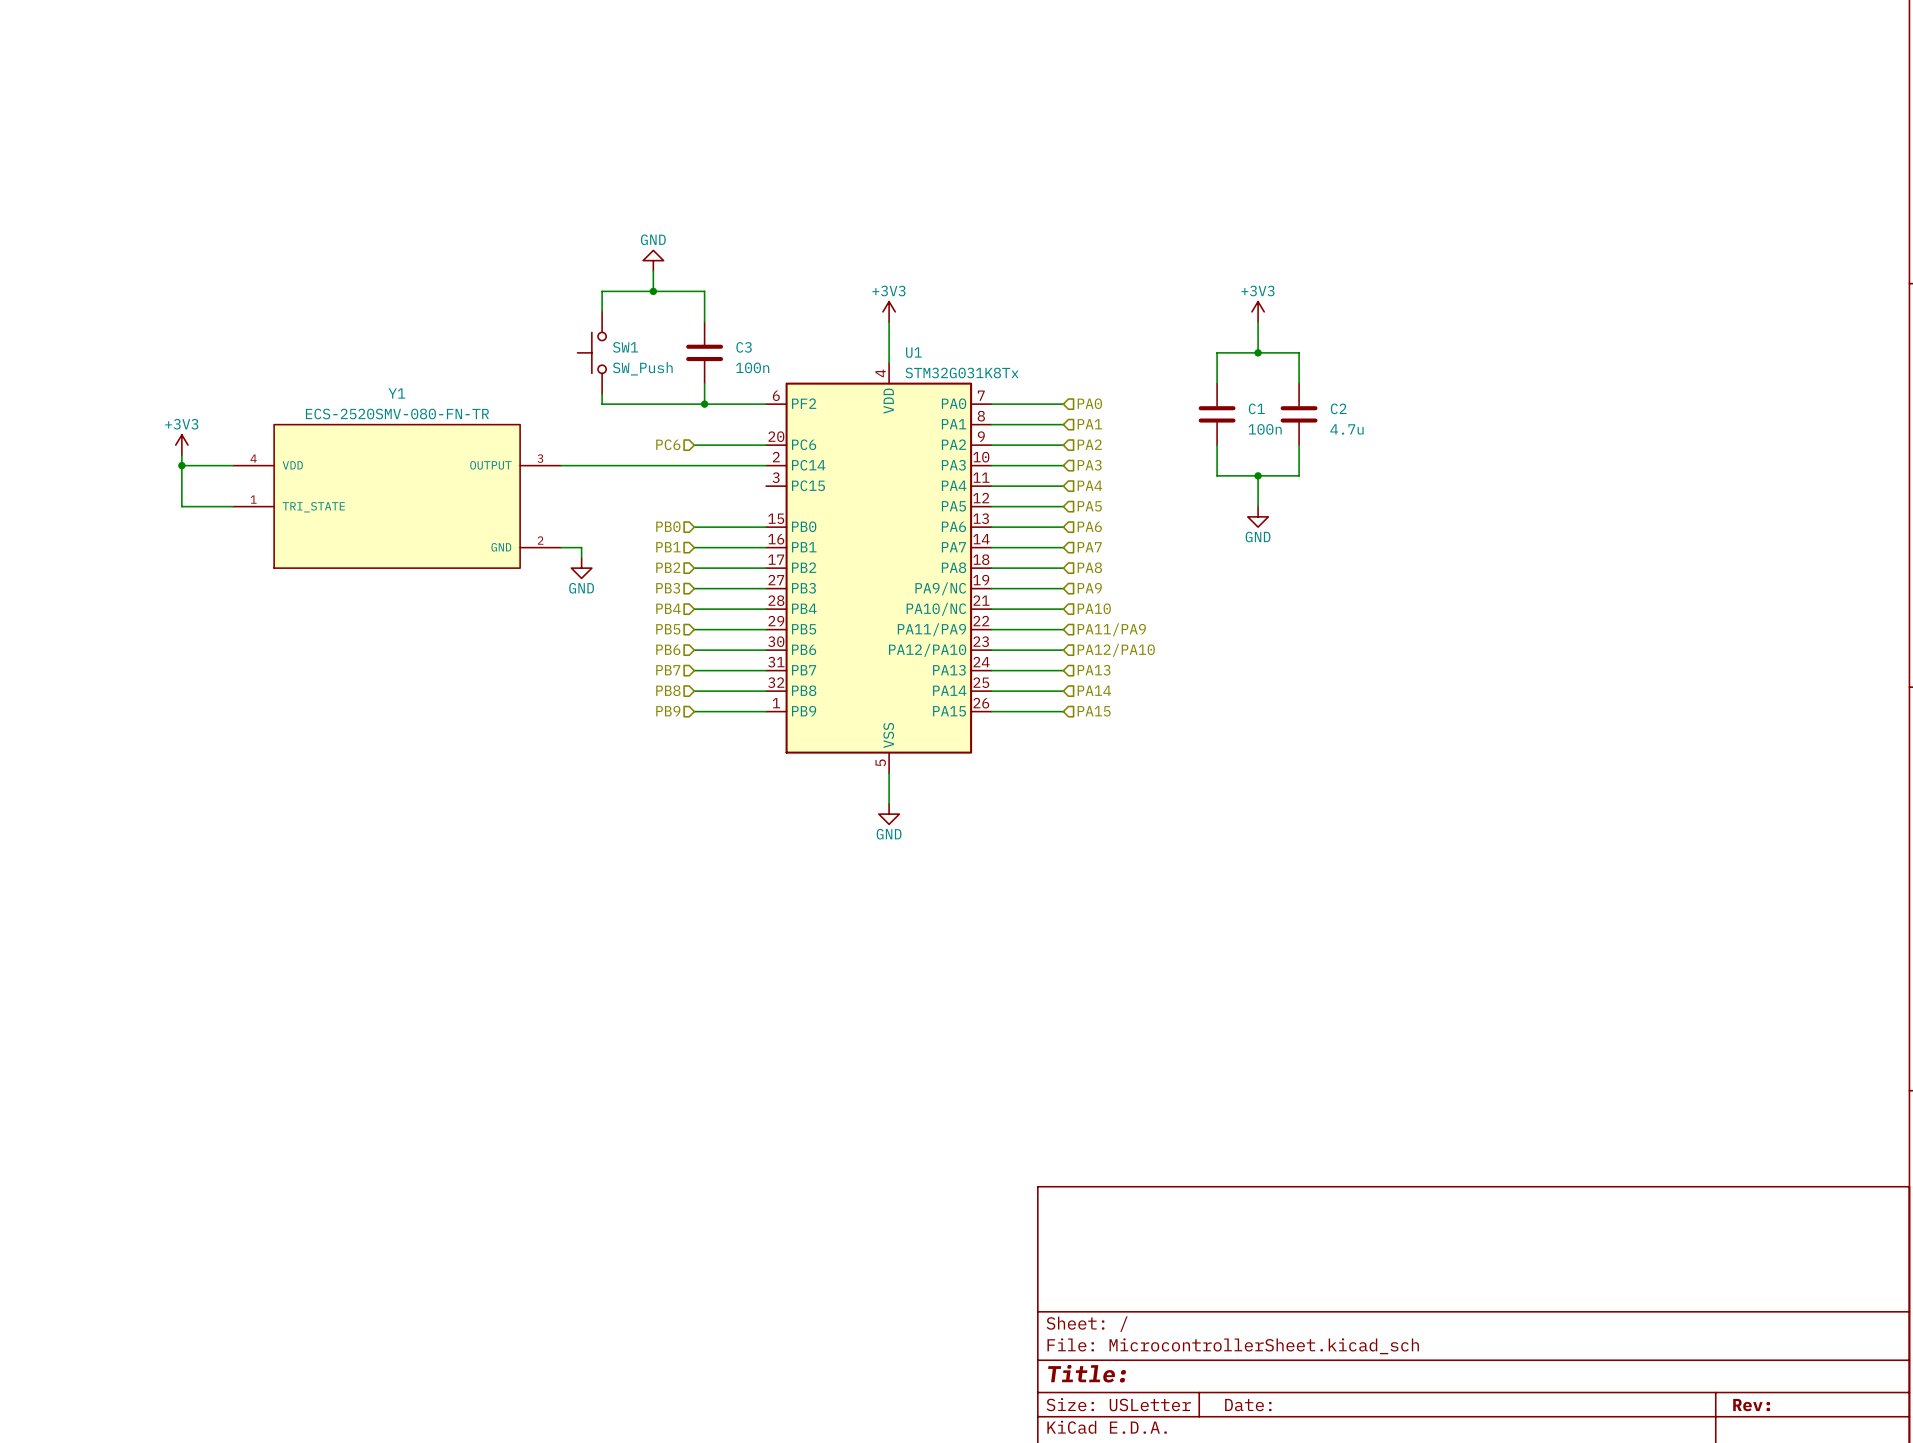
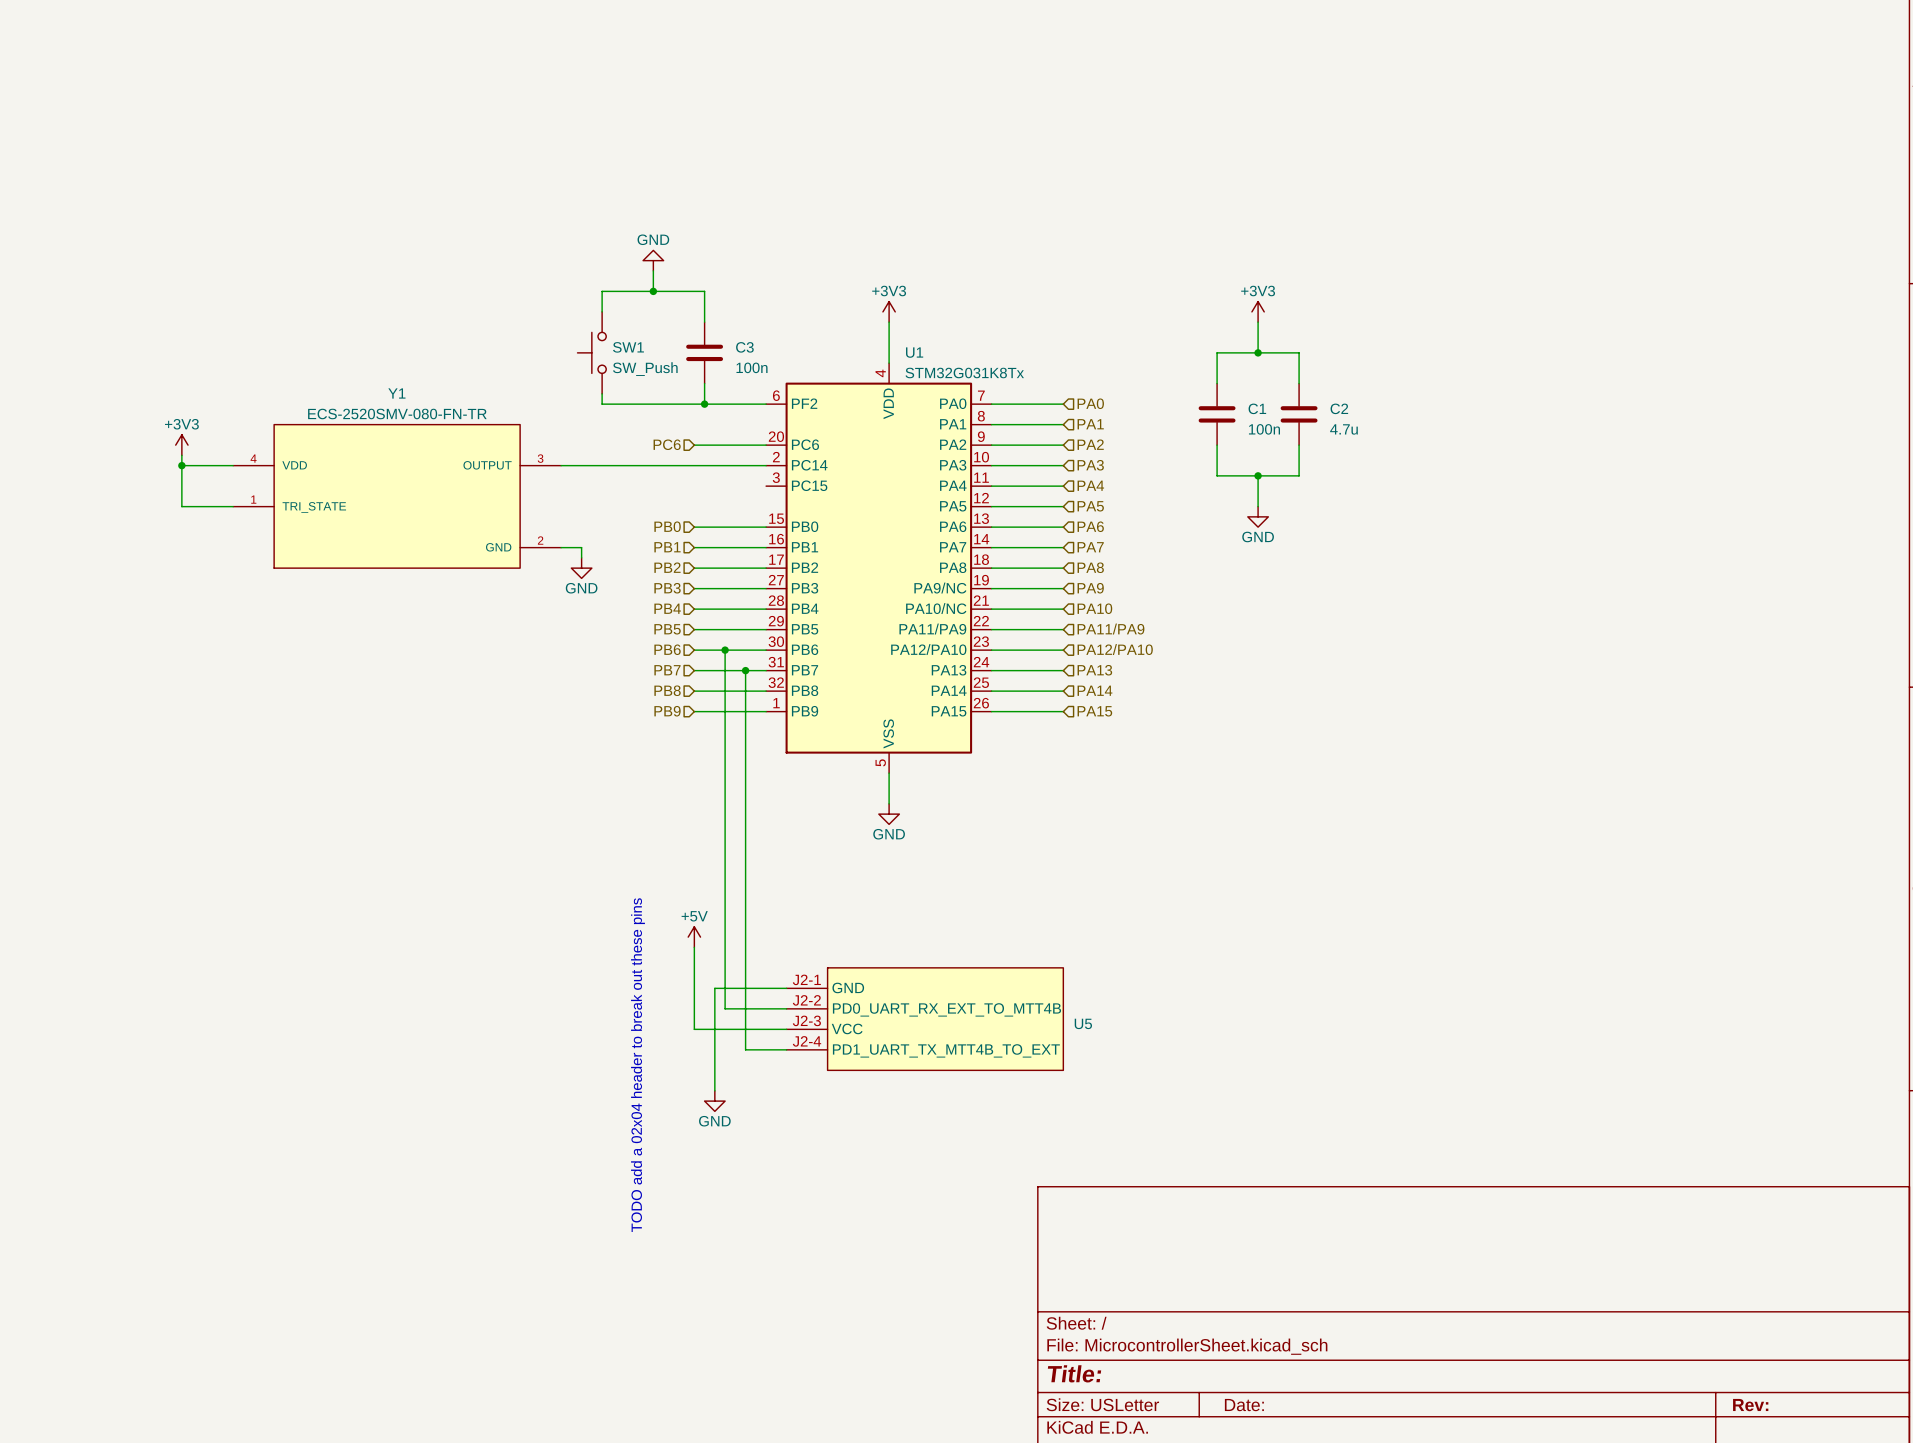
wire: none -> (725, 650) (725, 1008) (786, 1008)
junction: none -> (725, 650)
wire: none -> (745, 670) (745, 1049) (786, 1049)
junction: none -> (745, 670)
power symbol: none -> +5V (694, 937)
wire: none -> (694, 947) (694, 1029) (786, 1029)
wire: none -> (786, 988) (714, 988) (714, 1090)
U5: none -> (924, 1019)
text: none -> TODO add a 02x04 header to break out these pins (637, 1065)
power symbol: none -> GND (714, 1101)

